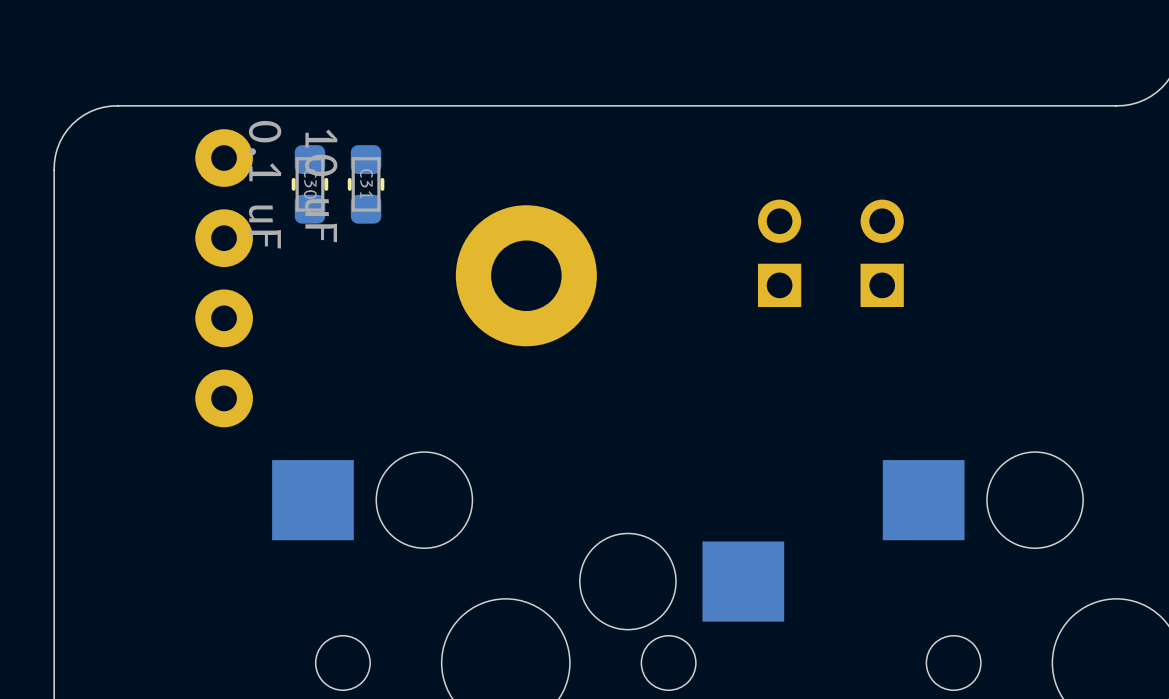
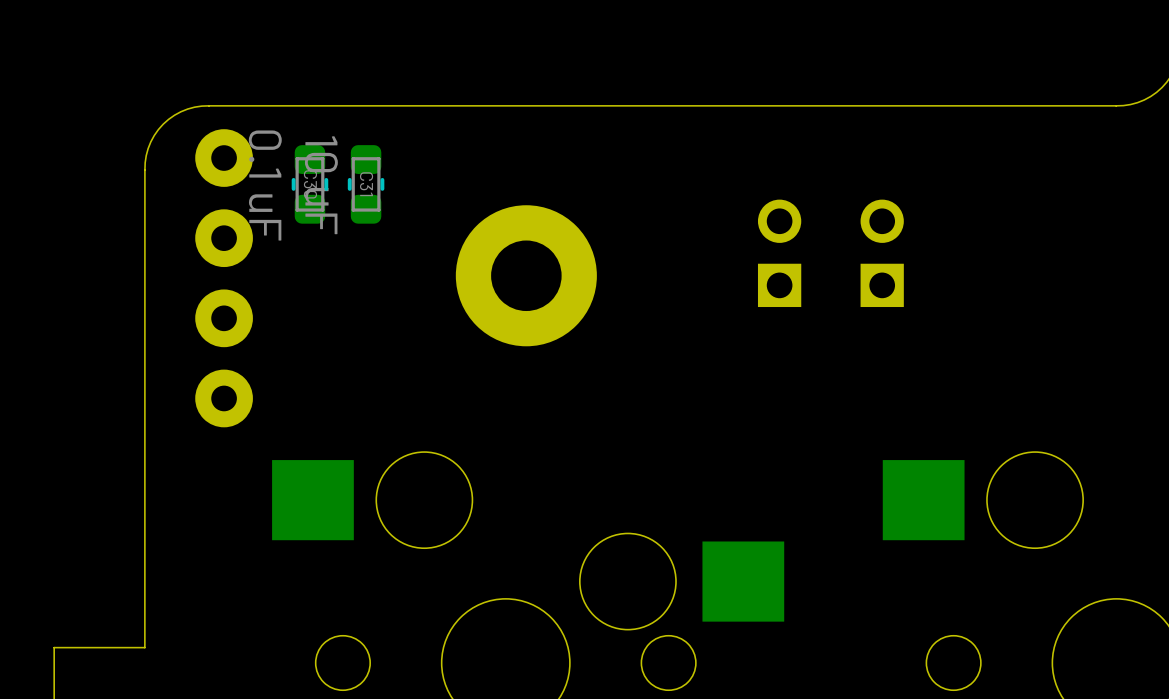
board edge: (209, 105) (118, 105) (96, 109) (83, 115) (72, 124) (63, 135) (57, 148) (54, 169) (54, 647) -> (209, 105) (187, 109) (168, 119) (154, 135) (148, 148) (145, 162) (144, 647) (54, 647)

